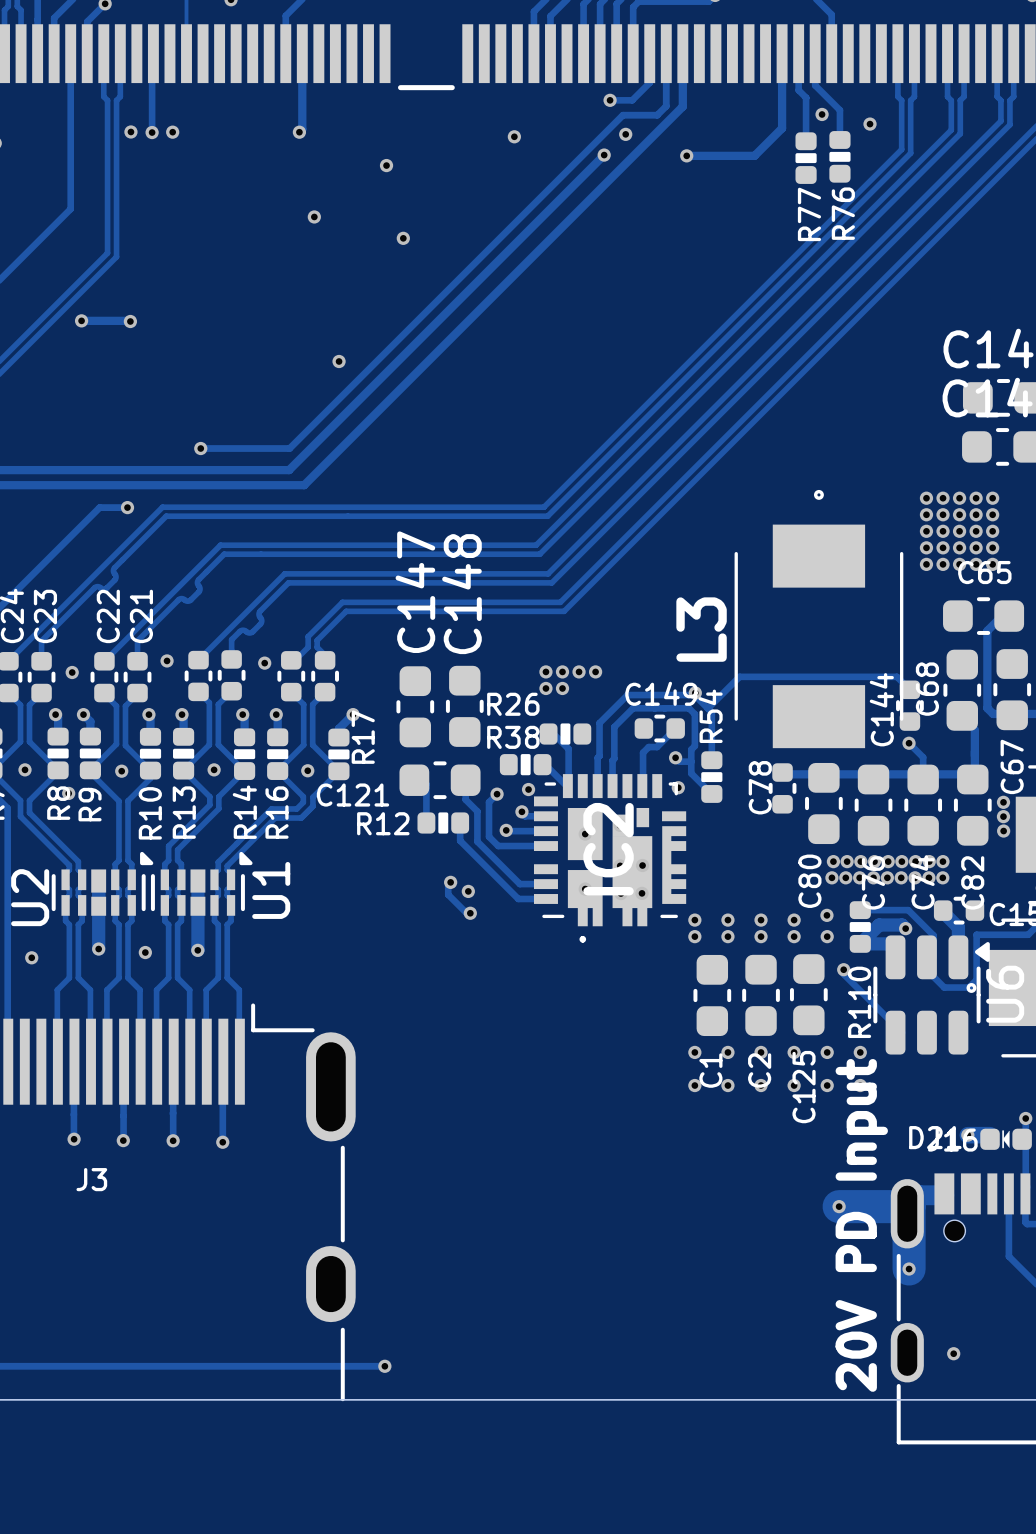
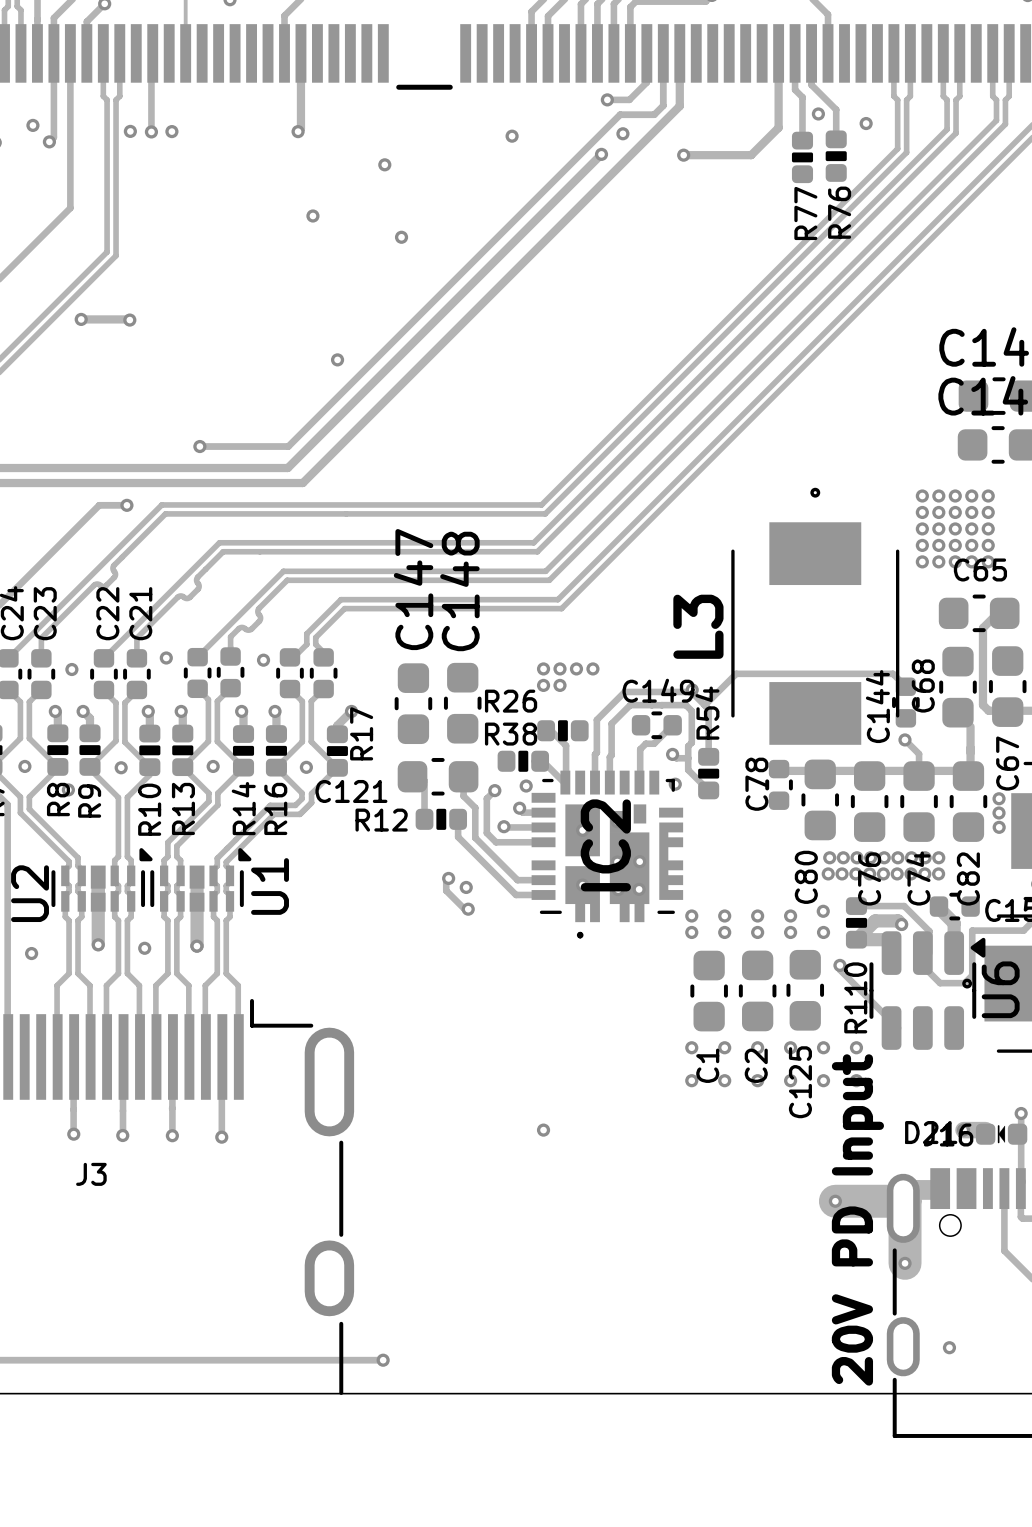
track: none -> (53, 53) (53, 137) (49, 141)
via: none -> (32, 125)
via: none -> (49, 141)
via: none -> (543, 1130)

